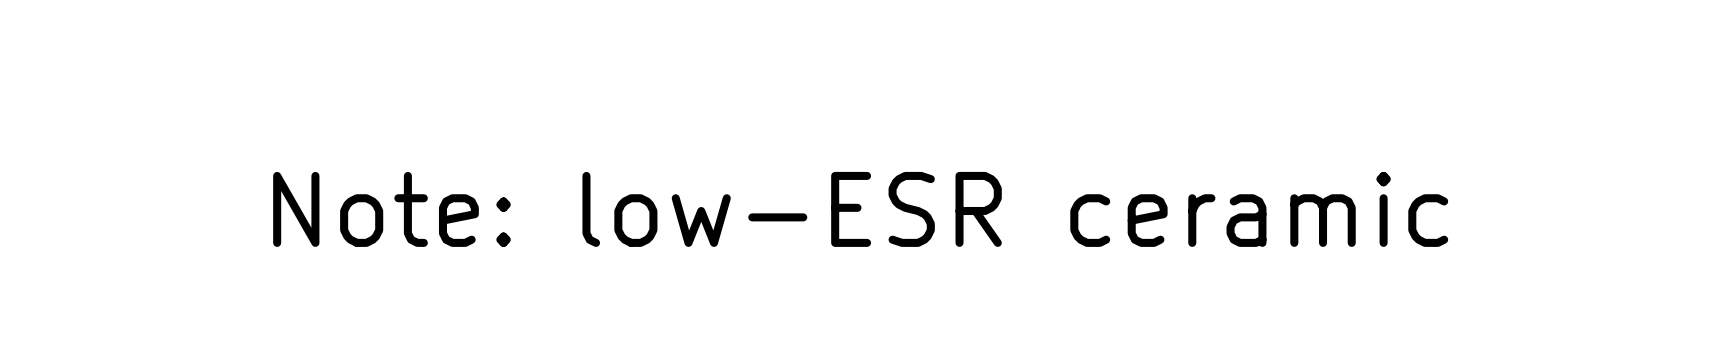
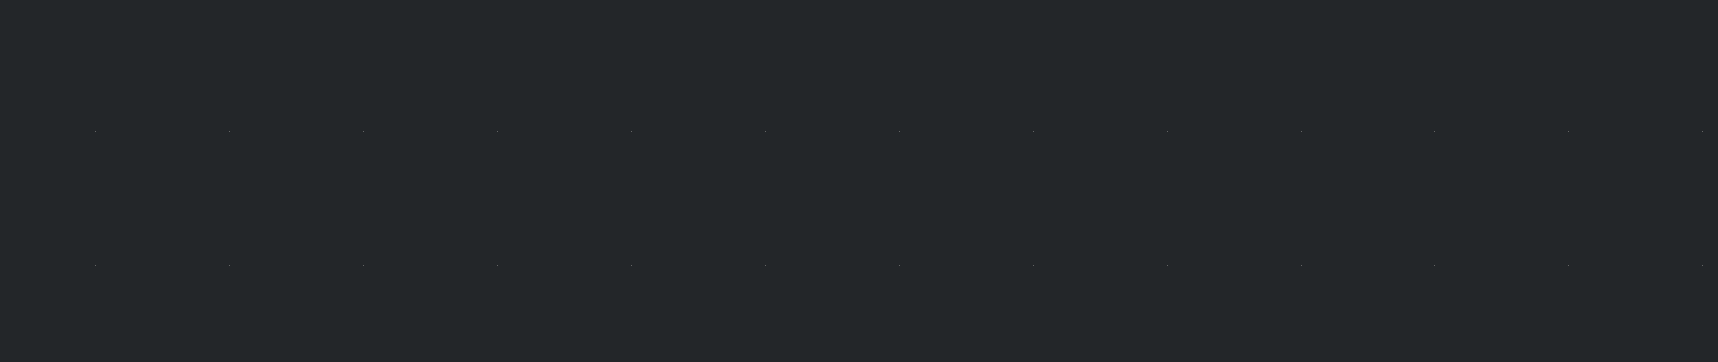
text: Note: low-ESR ceramic (860, 209) -> none

